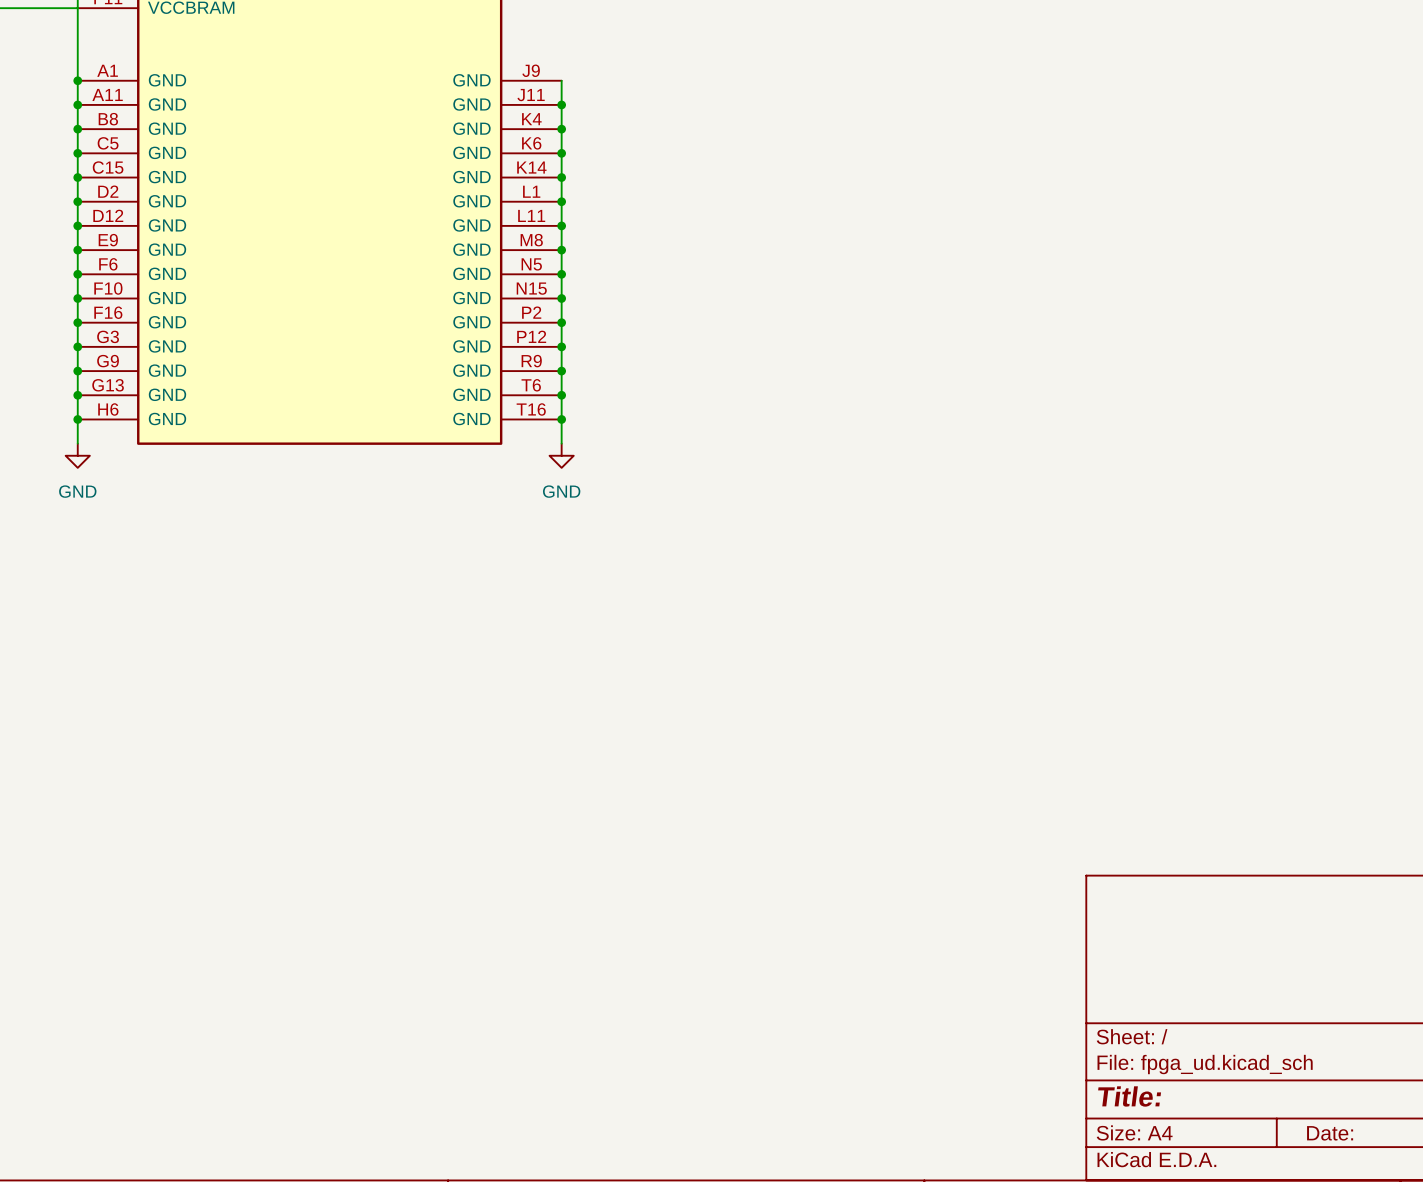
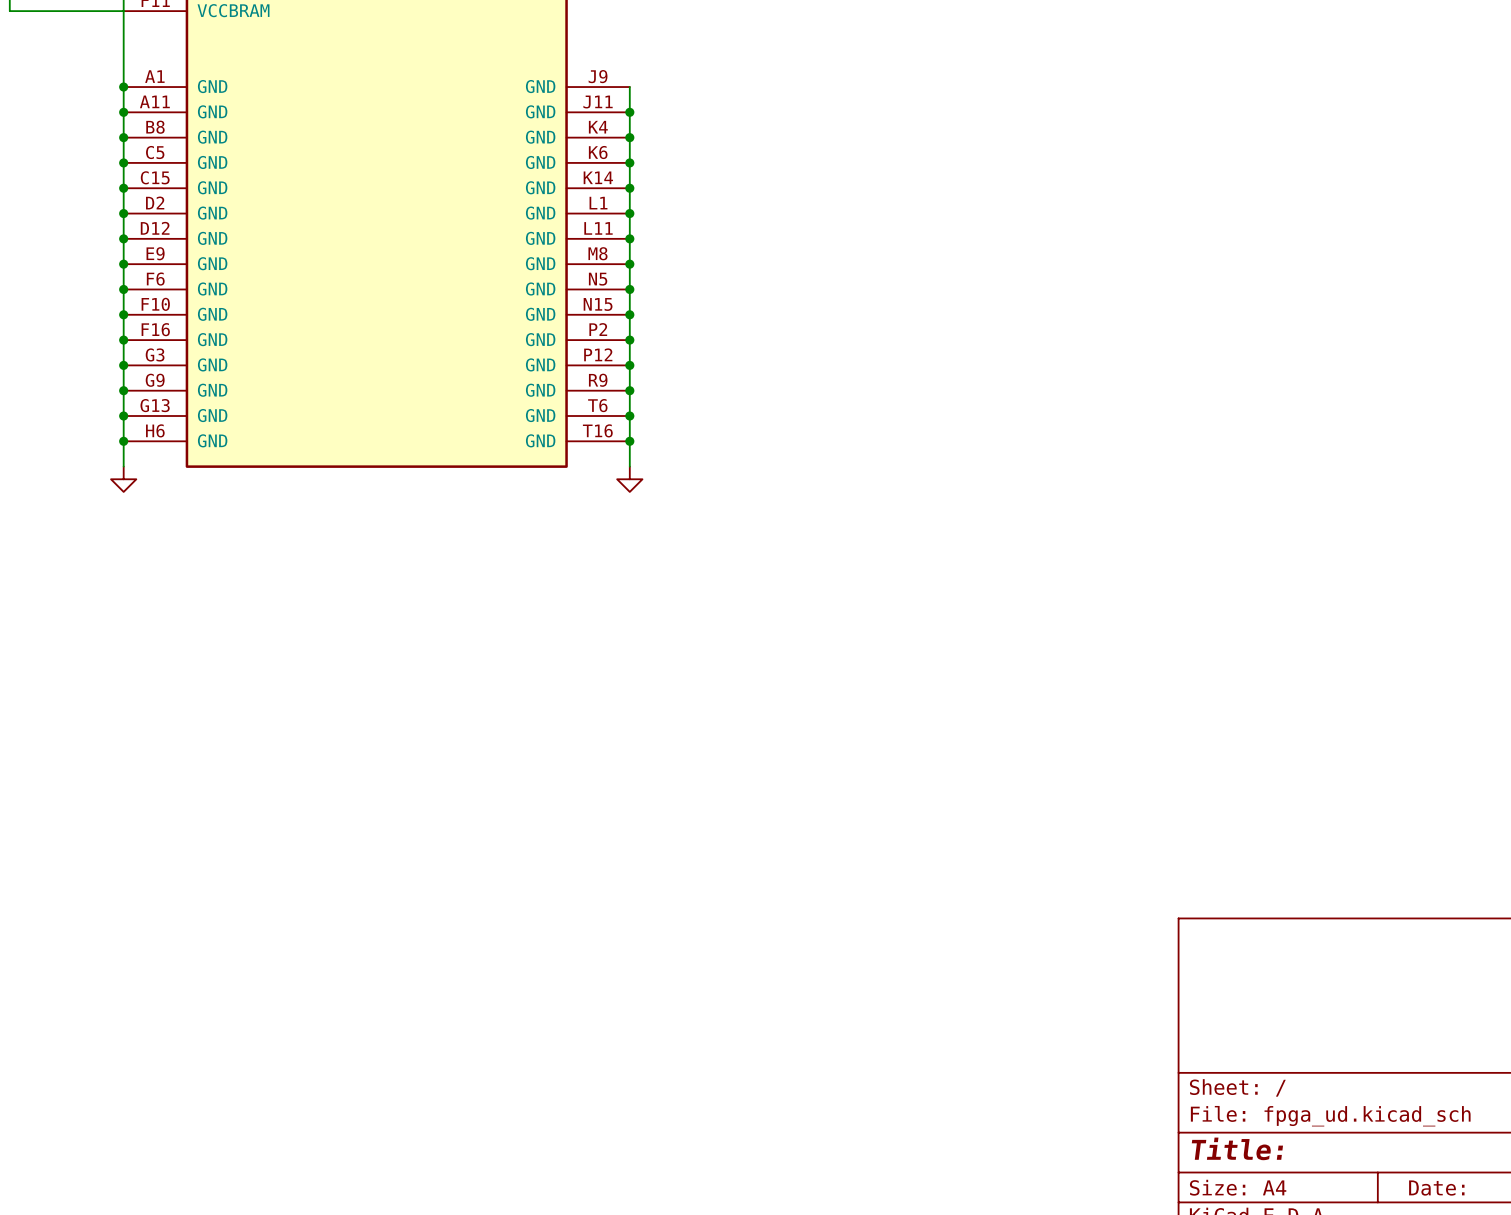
power symbol text: GND (77, 491) -> none
power symbol text: GND (561, 491) -> none

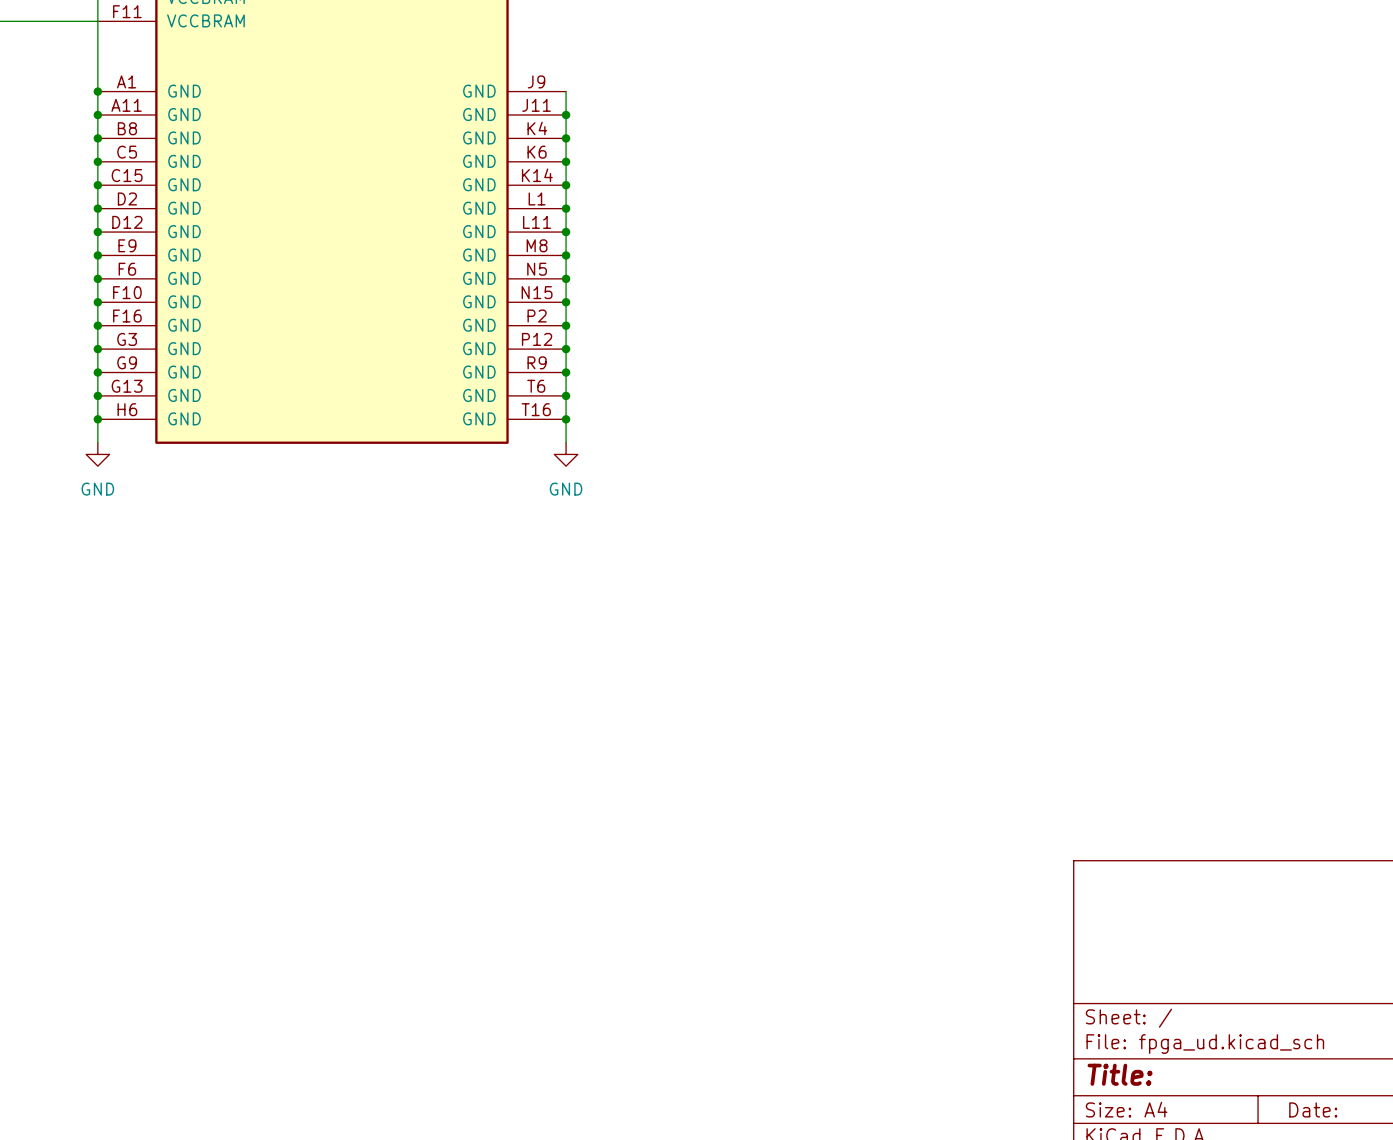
power symbol text: none -> GND (97, 489)
power symbol text: none -> GND (566, 489)

